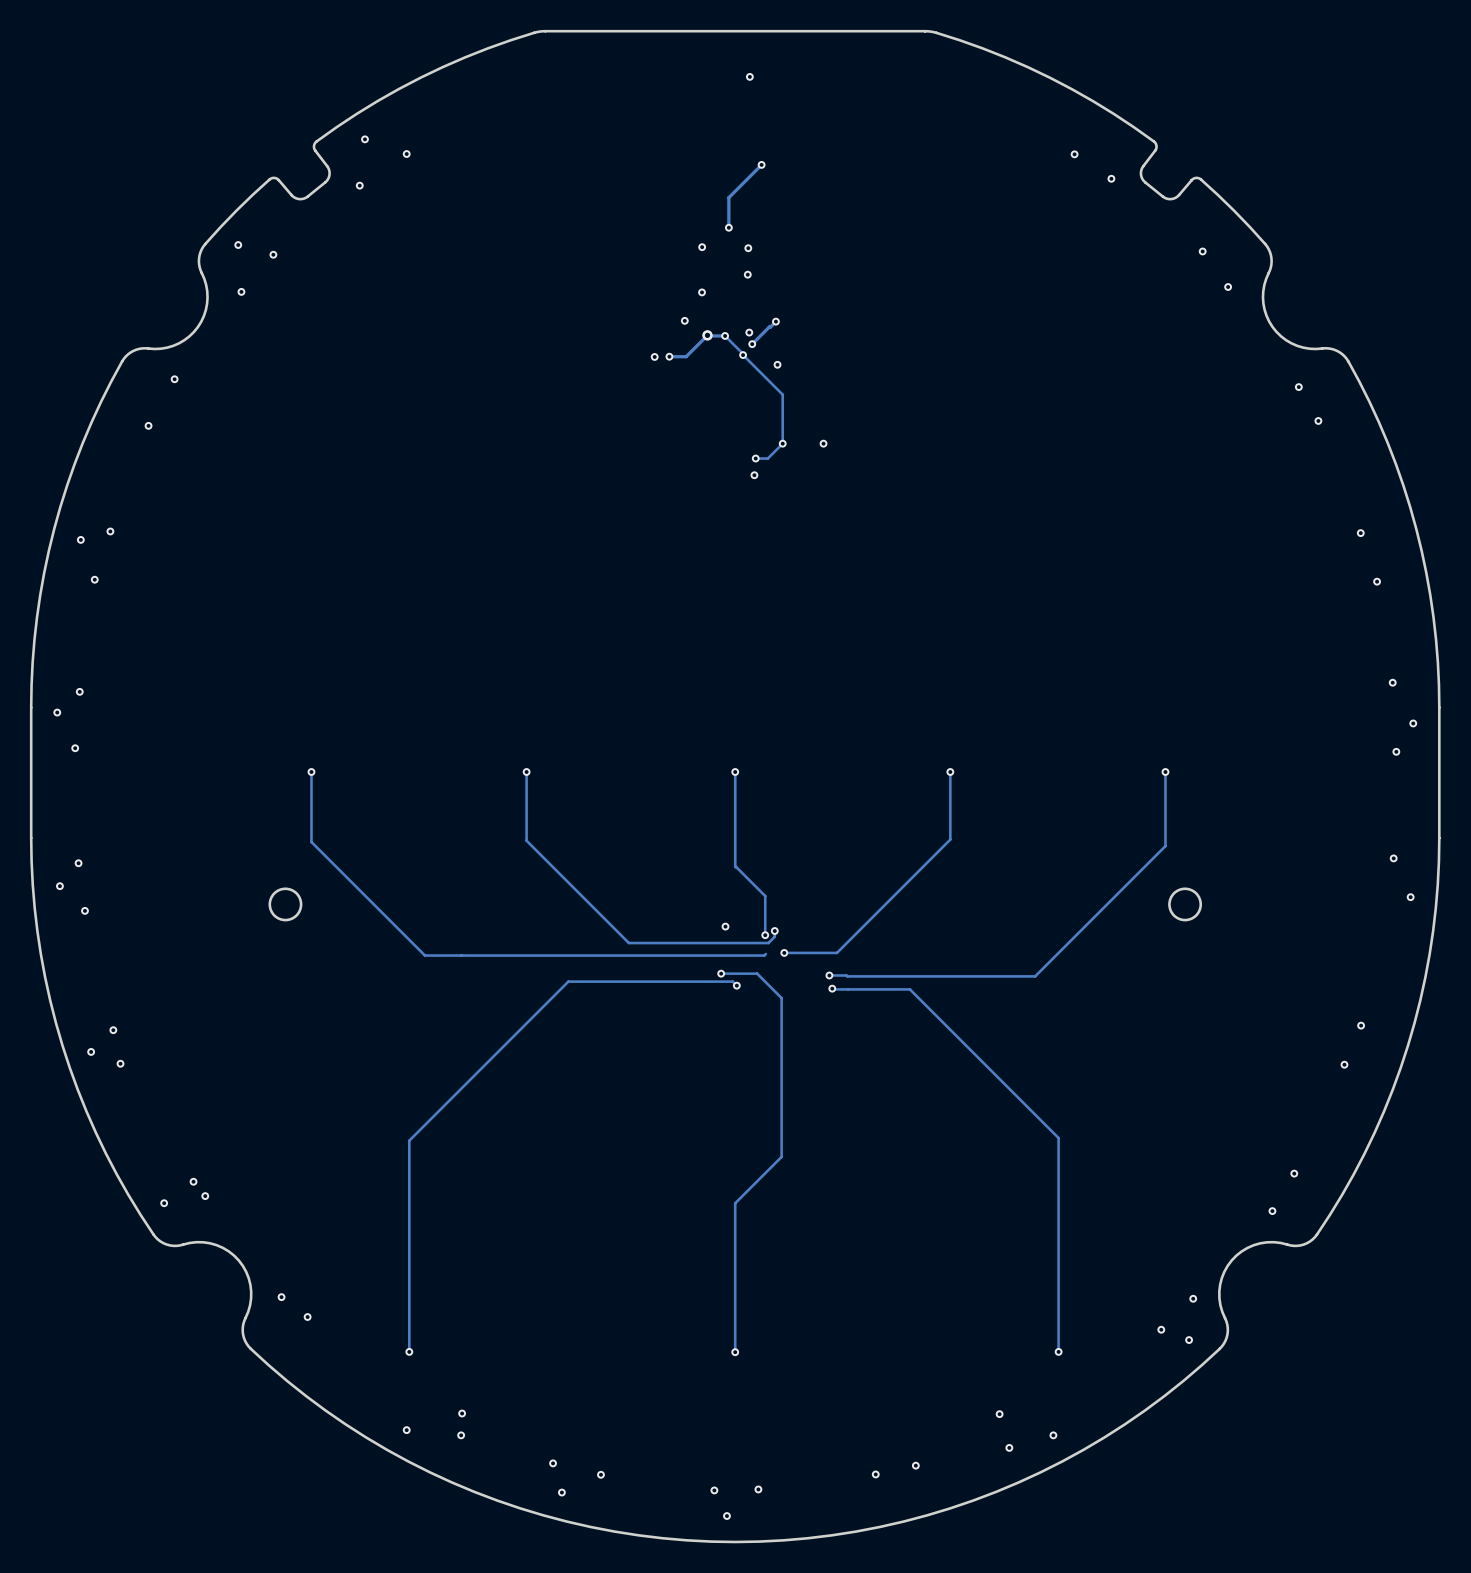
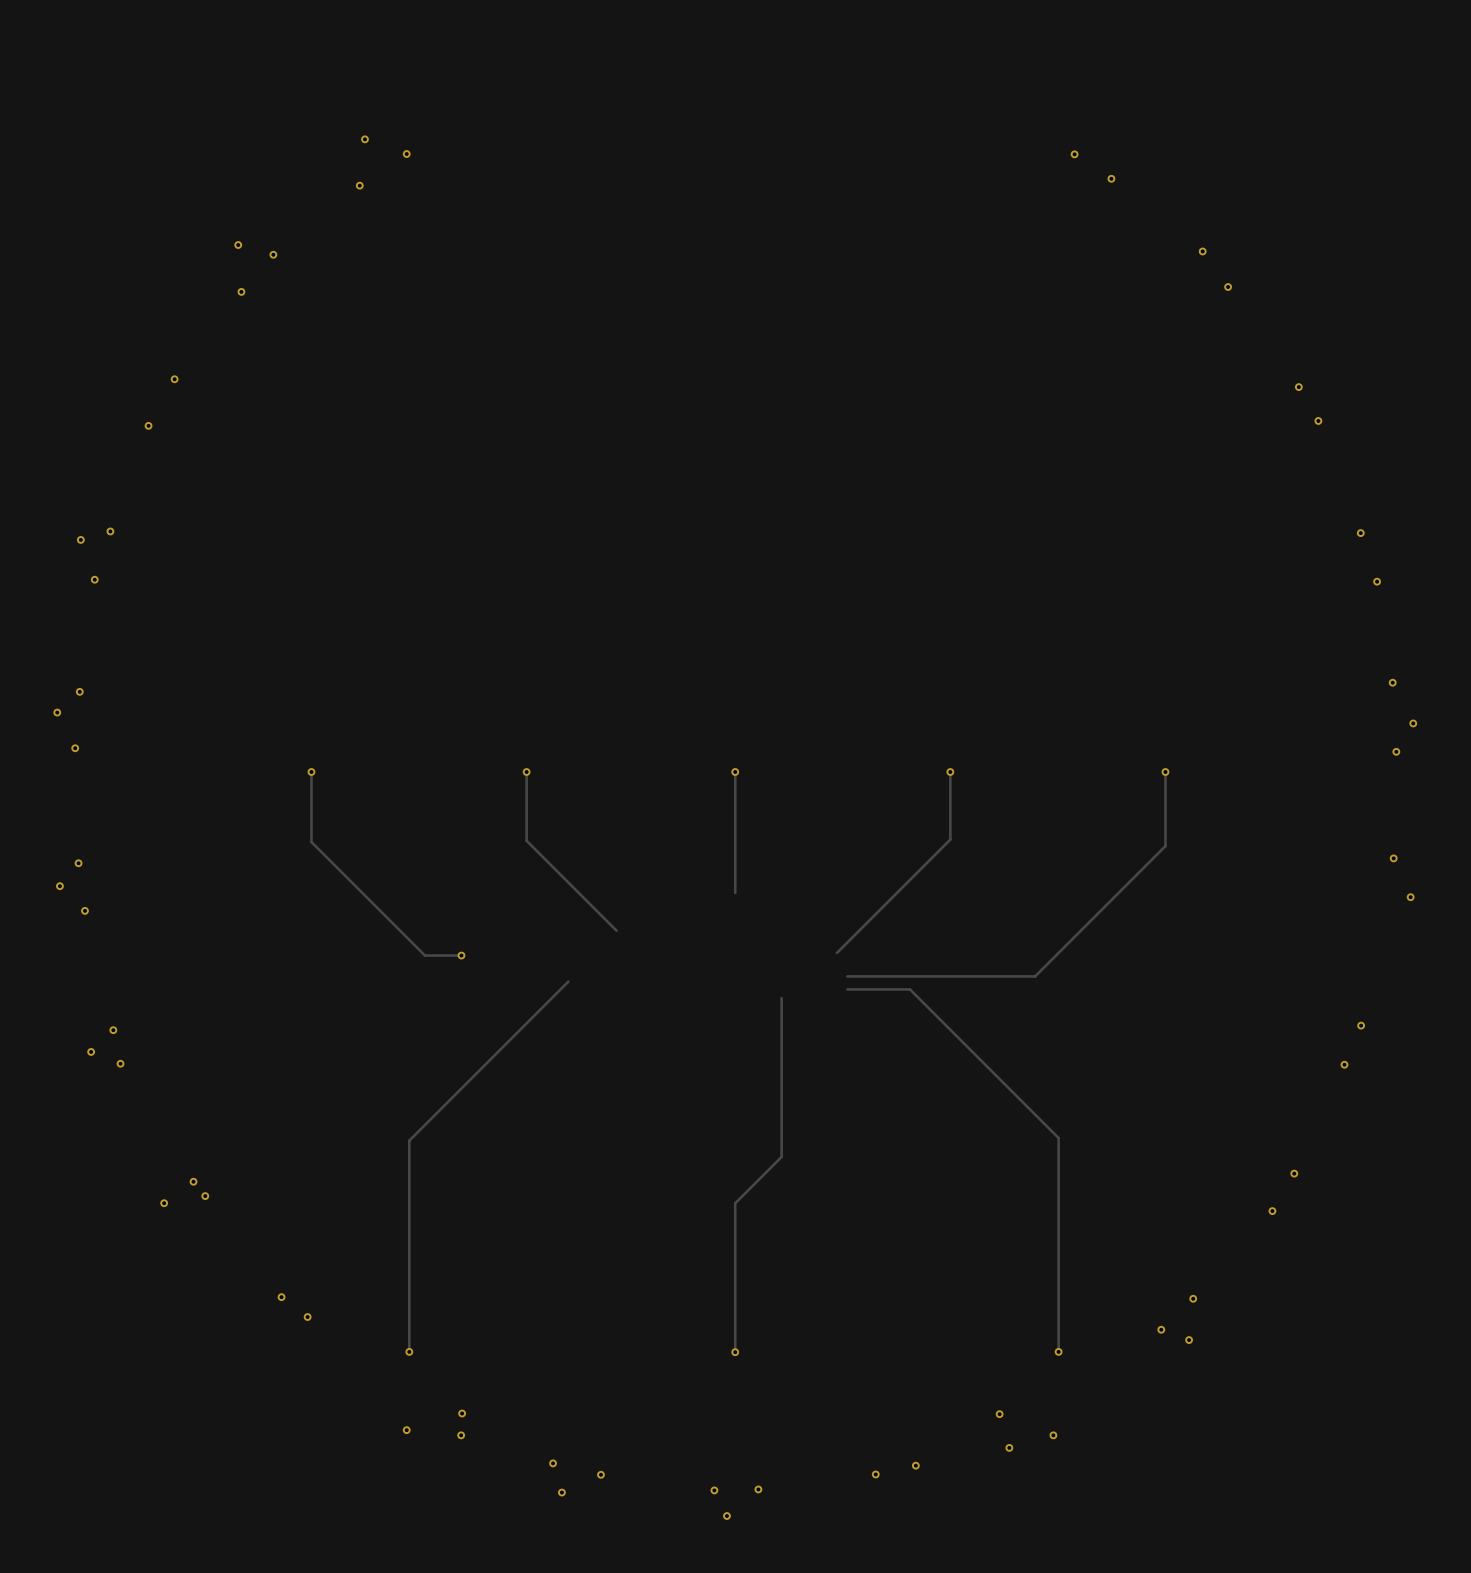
board edge: (925, 31) (539, 31) (465, 57) (420, 77) (377, 101) (315, 143) (314, 149) (329, 170) (328, 177) (325, 182) (306, 197) (299, 199) (292, 196) (277, 179) (270, 178) (236, 210) (203, 246) (199, 254) (199, 264) (206, 284) (207, 297) (205, 309) (201, 321) (194, 331) (179, 343) (160, 348) (139, 348) (130, 352) (123, 358) (101, 401) (82, 442) (60, 506) (48, 550) (37, 617) (31, 684) (31, 837) (34, 908) (45, 977) (62, 1045) (86, 1111) (116, 1174) (140, 1214) (160, 1241) (173, 1245) (196, 1242) (210, 1243) (222, 1247) (238, 1260) (246, 1271) (251, 1291) (250, 1305) (242, 1327) (245, 1340) (268, 1365) (306, 1396) (366, 1437) (430, 1472) (497, 1500) (566, 1521) (638, 1535) (710, 1541) (783, 1540) (856, 1531) (927, 1515) (973, 1500) (1040, 1472) (1104, 1437) (1164, 1396) (1221, 1346) (1226, 1337) (1227, 1327) (1220, 1305) (1220, 1284) (1227, 1265) (1236, 1255) (1247, 1247) (1260, 1243) (1274, 1242) (1300, 1245) (1309, 1241) (1317, 1234) (1353, 1174) (1384, 1111) (1400, 1067) (1420, 1000) (1433, 931) (1438, 861) (1439, 707) (1436, 639) (1426, 572) (1410, 506) (1387, 442) (1359, 381) (1346, 358) (1340, 352) (1328, 348) (1309, 348) (1297, 345) (1286, 340) (1272, 326) (1264, 309) (1262, 297) (1264, 284) (1271, 264) (1269, 251) (1249, 227) (1217, 194) (1200, 179) (1196, 177) (1192, 179) (1176, 196) (1168, 199) (1143, 180) (1141, 170) (1155, 149) (1153, 141) (1113, 113) (1049, 77) (982, 48) (936, 32) (925, 31) -> none
via: (749, 76) -> none
track: (761, 164) (728, 197) (728, 227) -> none
via: (761, 164) -> none
via: (728, 227) -> none
via: (702, 247) -> none
via: (748, 248) -> none
via: (747, 274) -> none
via: (702, 292) -> none
via: (684, 320) -> none
track: (775, 321) (752, 344) -> none
via: (775, 321) -> none
via: (749, 332) -> none
via: (707, 335) -> none
via: (725, 335) -> none
via: (752, 344) -> none
via: (743, 355) -> none
via: (654, 356) -> none
track: (669, 356) (686, 356) (707, 335) (725, 335) (782, 394) (782, 443) (767, 458) (755, 458) -> none
via: (669, 356) -> none
via: (777, 364) -> none
via: (782, 443) -> none
via: (823, 443) -> none
via: (755, 458) -> none
via: (754, 475) -> none
track: (735, 867) (765, 896) (765, 935) -> (735, 867) (735, 892)
round board edge: [268, 887, 303, 922] -> none
round board edge: [1168, 887, 1203, 922] -> none
via: (725, 926) -> none
track: (616, 930) (628, 943) (768, 943) (774, 936) (774, 930) -> none
via: (774, 930) -> none
via: (765, 935) -> none
via: (784, 952) -> none
track: (836, 952) (784, 952) -> none
track: (765, 953) (764, 955) (461, 955) -> none
via: none -> (461, 955)
track: (721, 973) (757, 973) (781, 998) -> none
via: (721, 973) -> none
track: (829, 975) (847, 976) -> none
via: (829, 975) -> none
track: (568, 981) (732, 981) (736, 985) -> none
via: (736, 985) -> none
track: (832, 988) (847, 989) -> none
via: (832, 988) -> none

